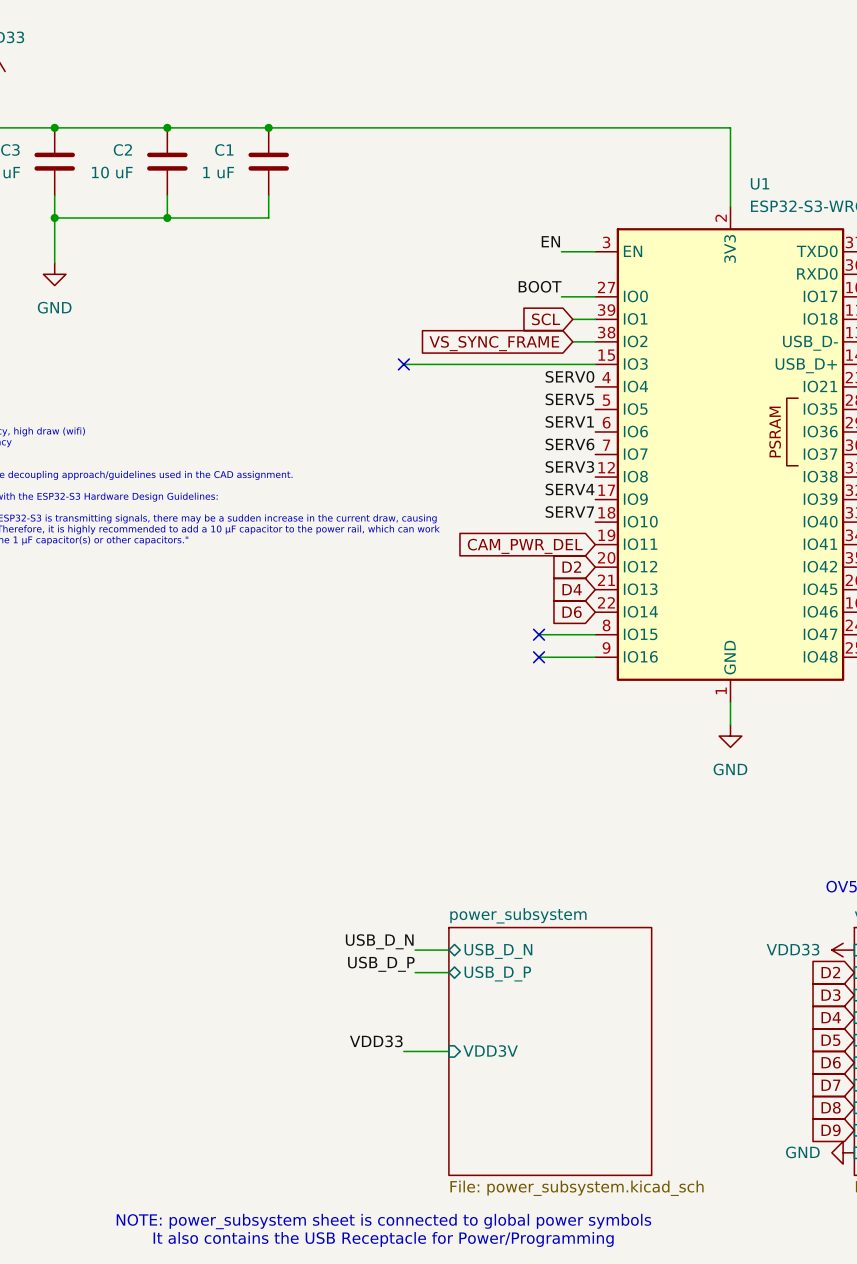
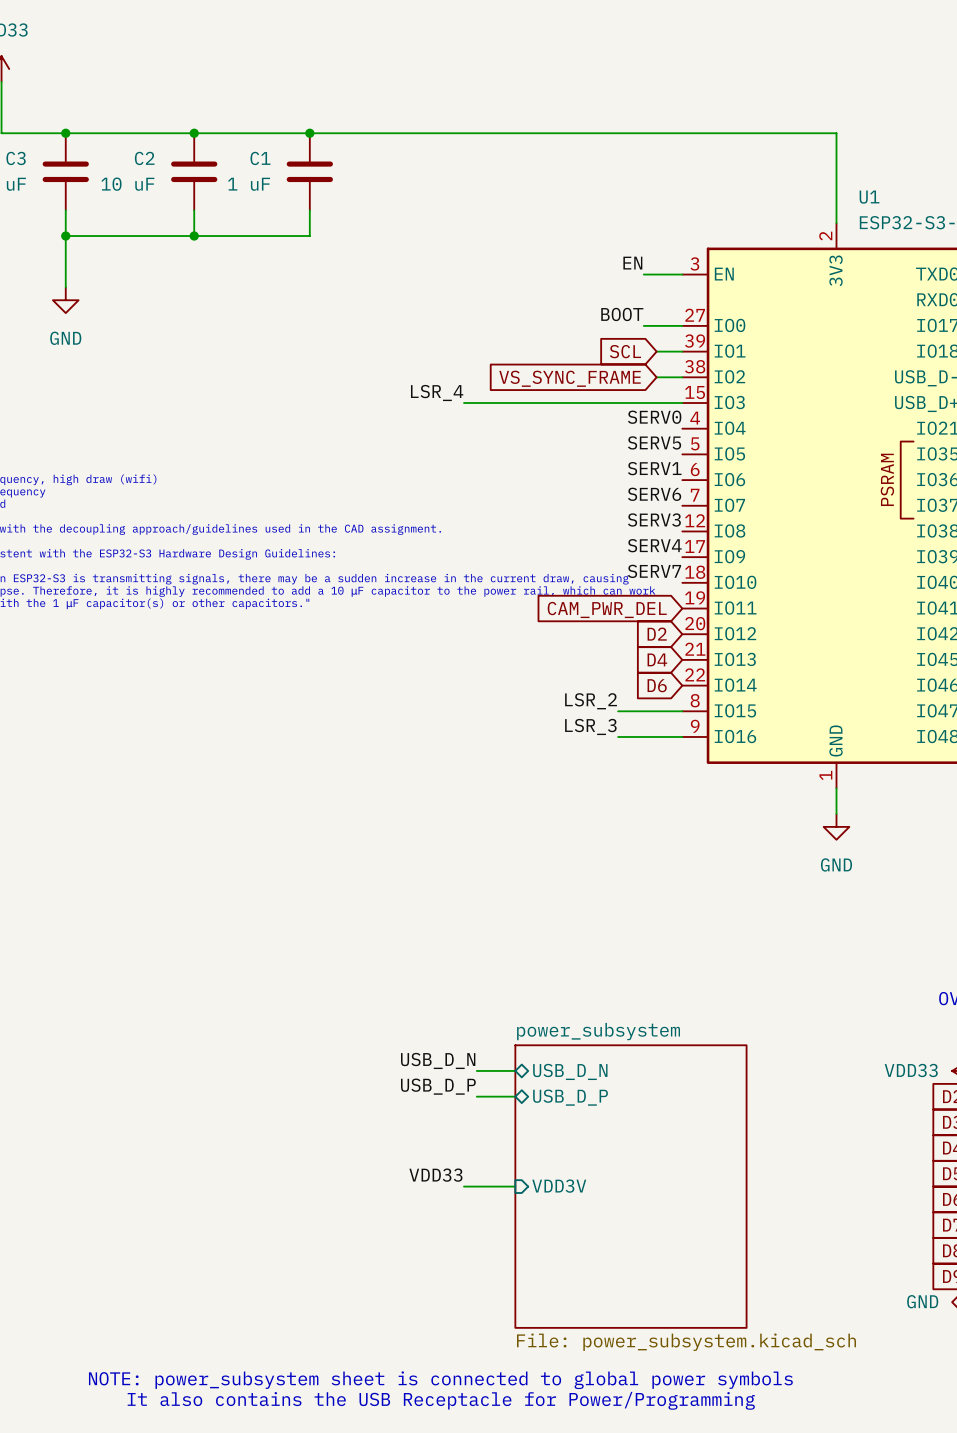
label: none -> LSR_4 (437, 392)
no-connect mark: (403, 364) -> none
label: none -> LSR_2 (591, 701)
no-connect mark: (539, 634) -> none
label: none -> LSR_3 (590, 726)
no-connect mark: (539, 657) -> none

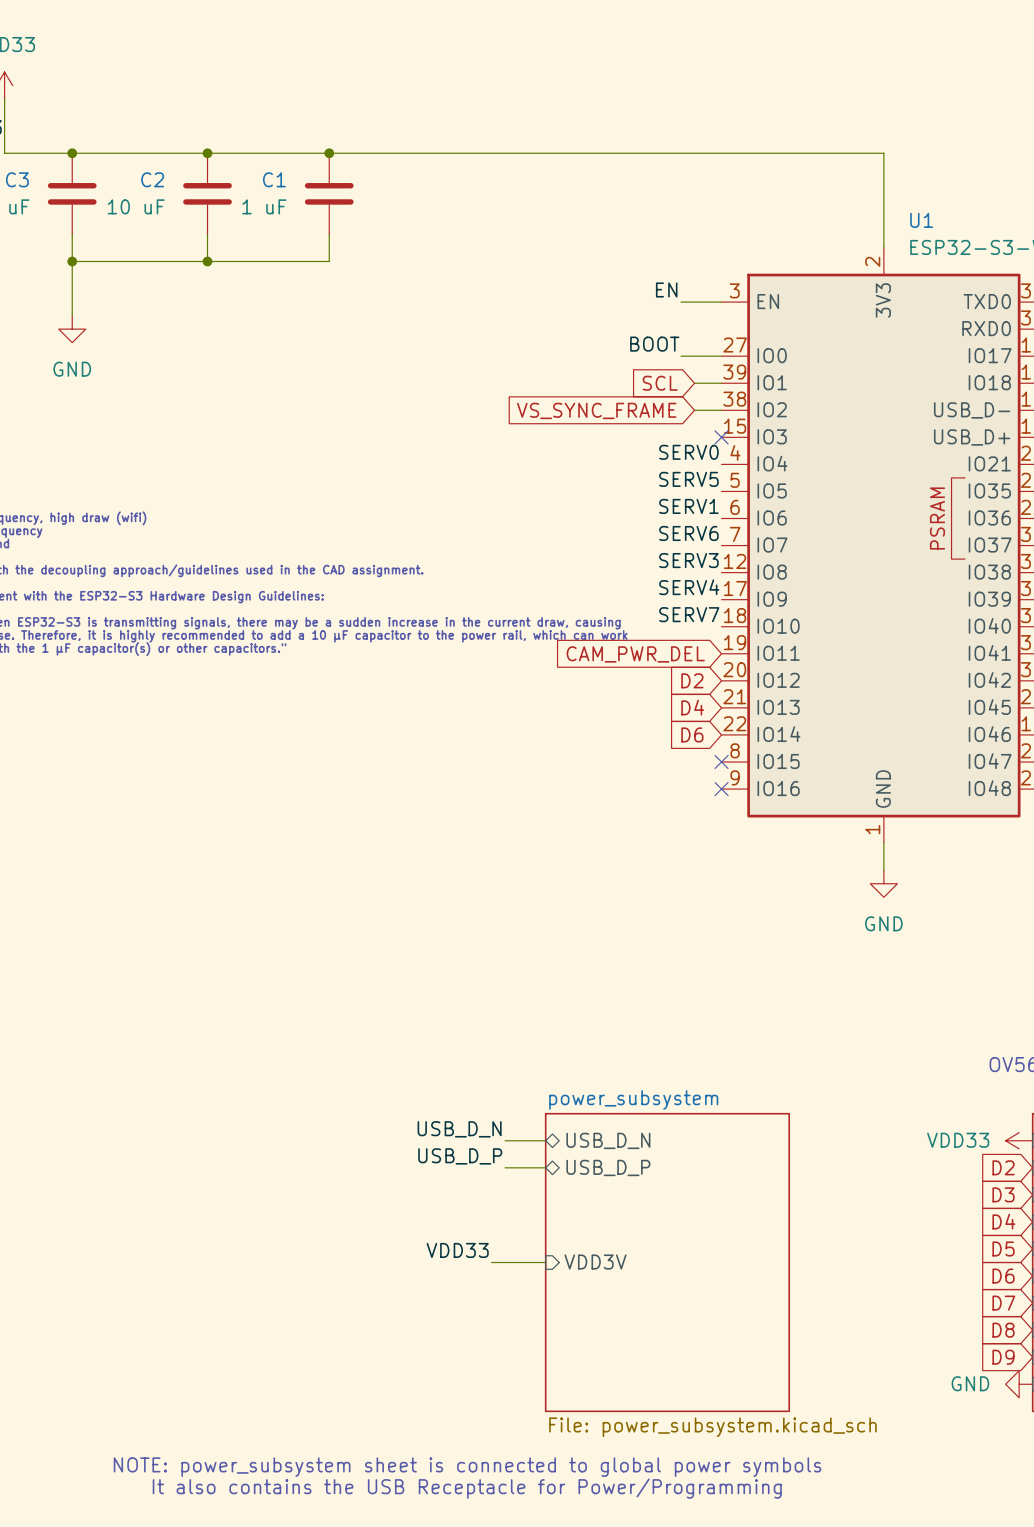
label: LSR_4 (437, 392) -> none
wire: (463, 403) (682, 403) -> none
no-connect mark: none -> (721, 437)
label: LSR_2 (591, 701) -> none
wire: (618, 711) (682, 711) -> none
no-connect mark: none -> (721, 762)
label: LSR_3 (590, 726) -> none
wire: (618, 736) (682, 736) -> none
no-connect mark: none -> (721, 789)

